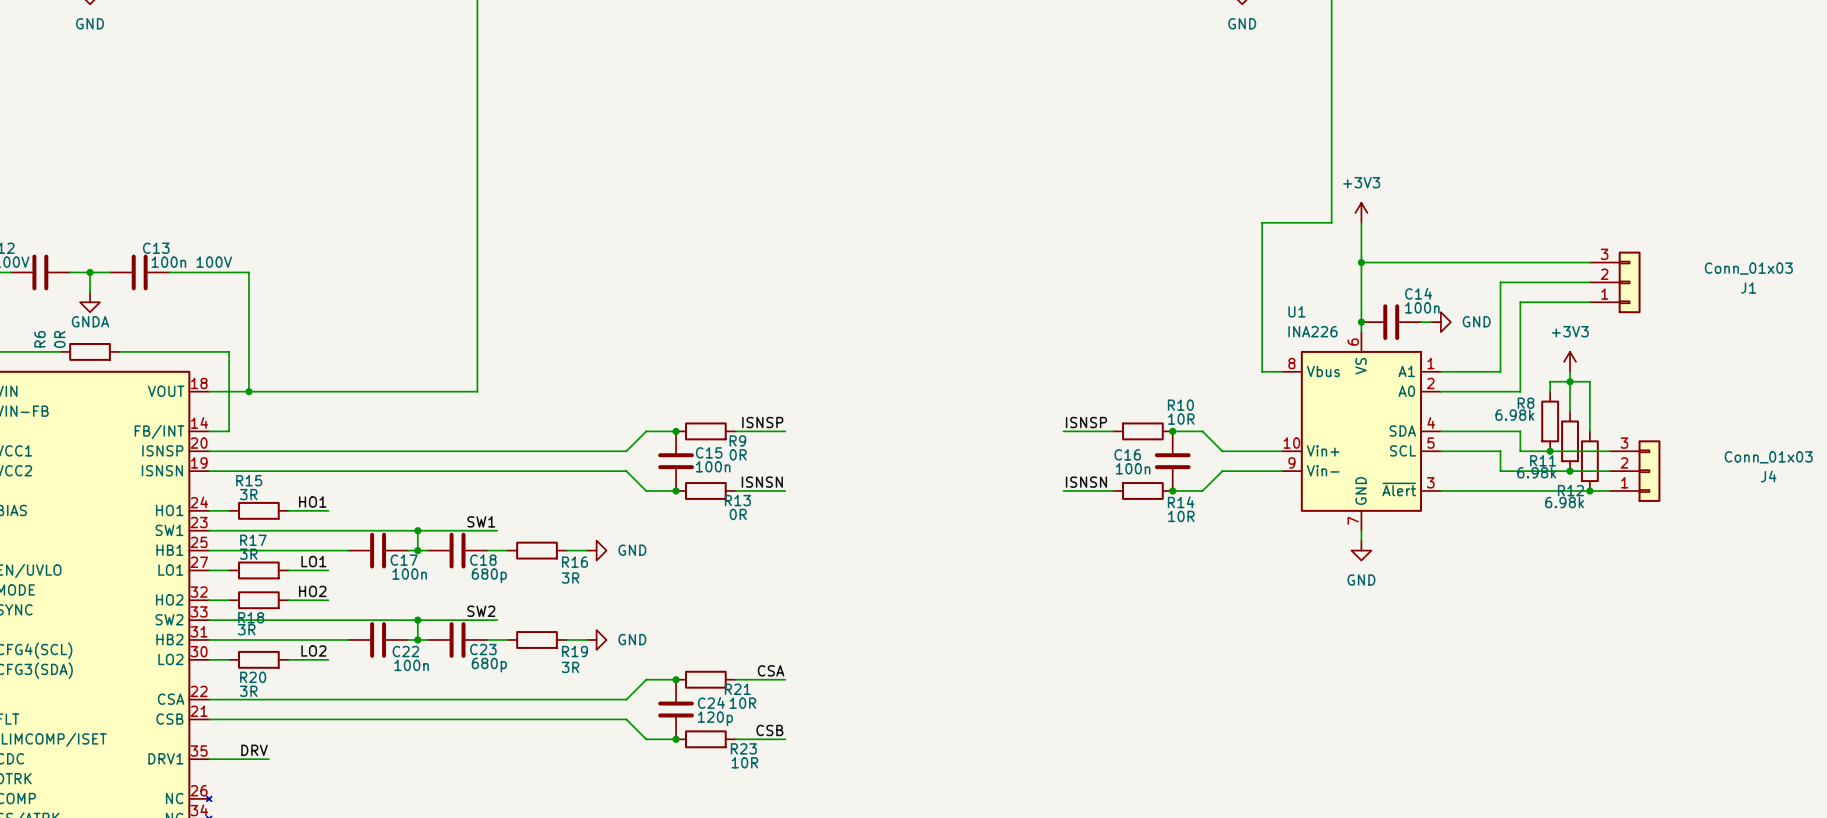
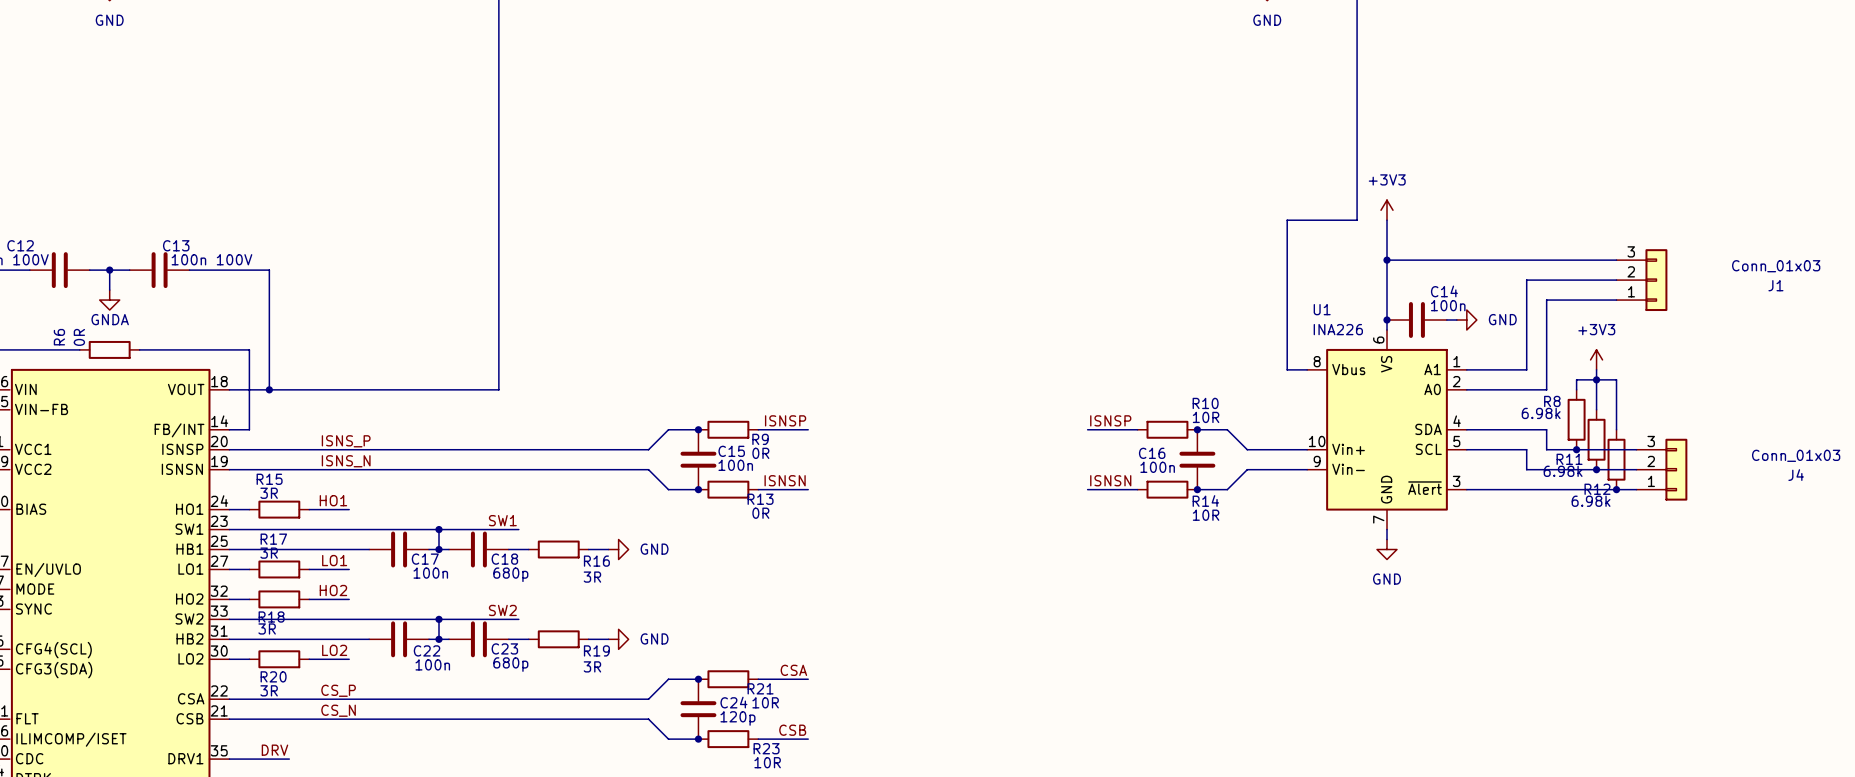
label: none -> ISNS_P (346, 441)
label: none -> ISNS_N (346, 461)
label: none -> CS_P (338, 690)
label: none -> CS_N (338, 710)

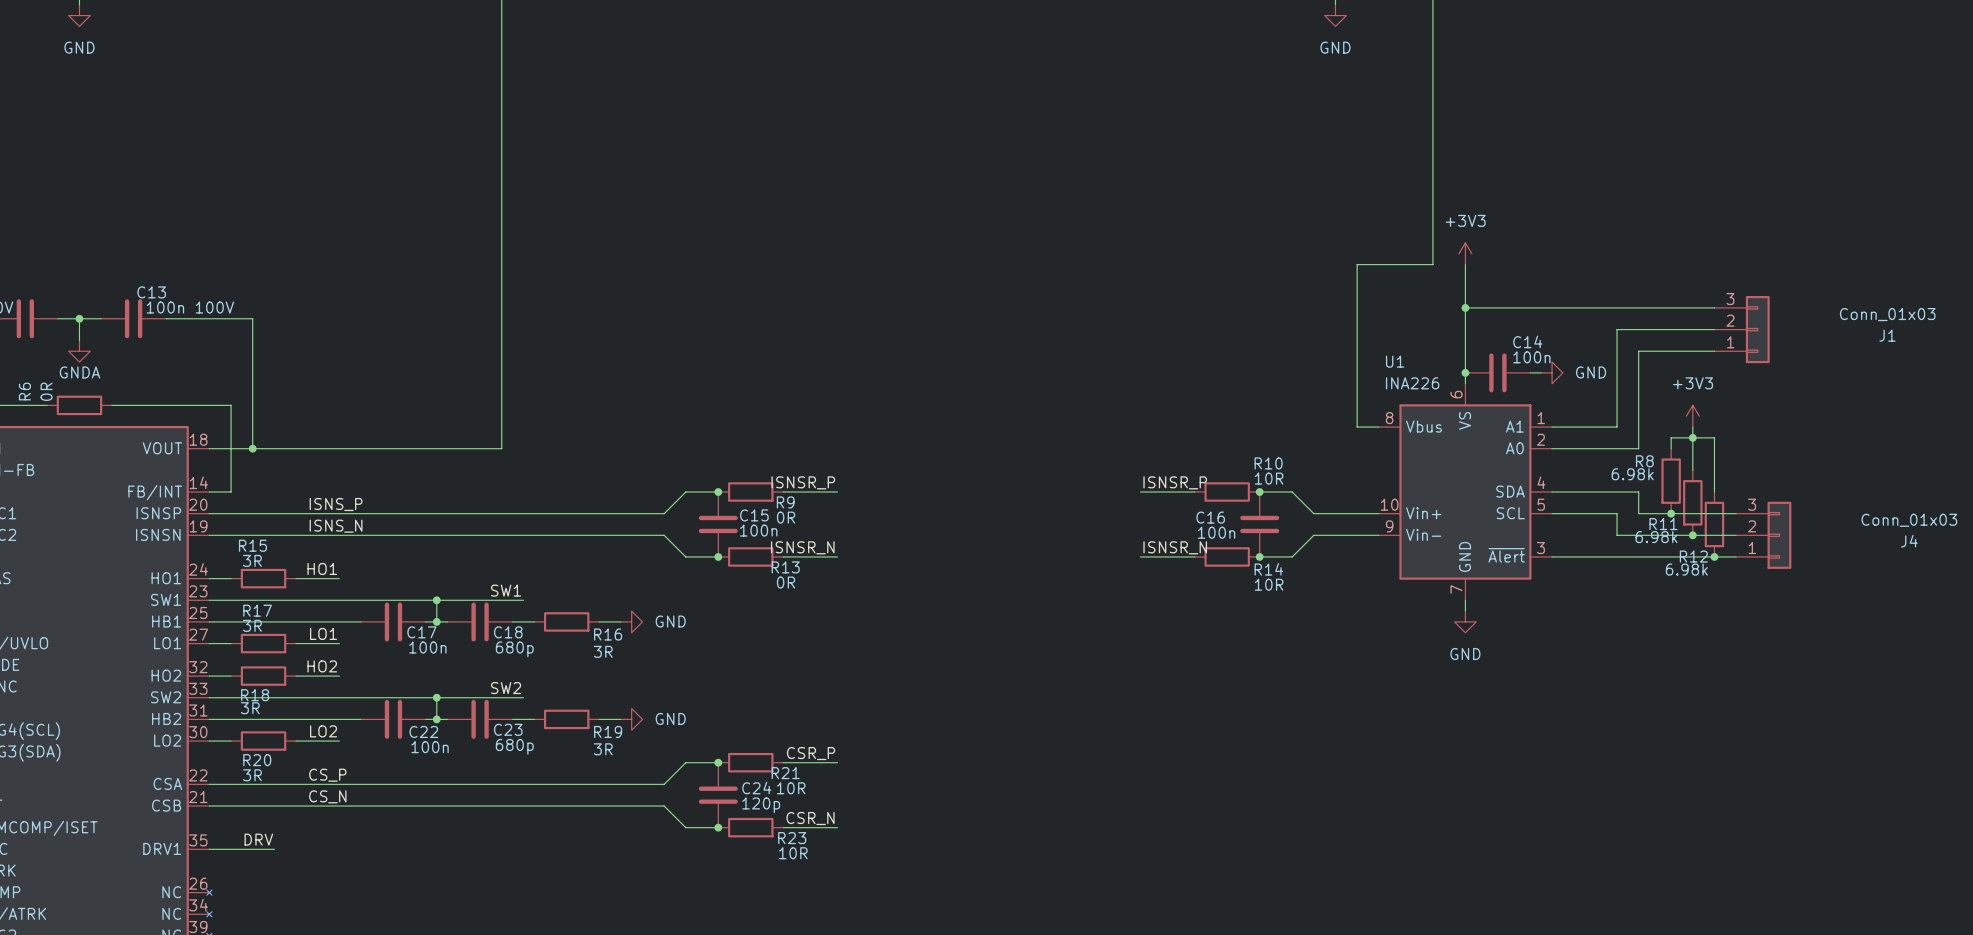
label: ISNSP (785, 420) -> ISNSR_P (803, 482)
label: ISNSP (1110, 420) -> ISNSR_P (1175, 482)
label: ISNSN (785, 480) -> ISNSR_N (802, 547)
label: ISNSN (1110, 480) -> ISNSR_N (1175, 547)
label: CSA (793, 670) -> CSR_P (811, 753)
label: CSB (792, 730) -> CSR_N (810, 818)

